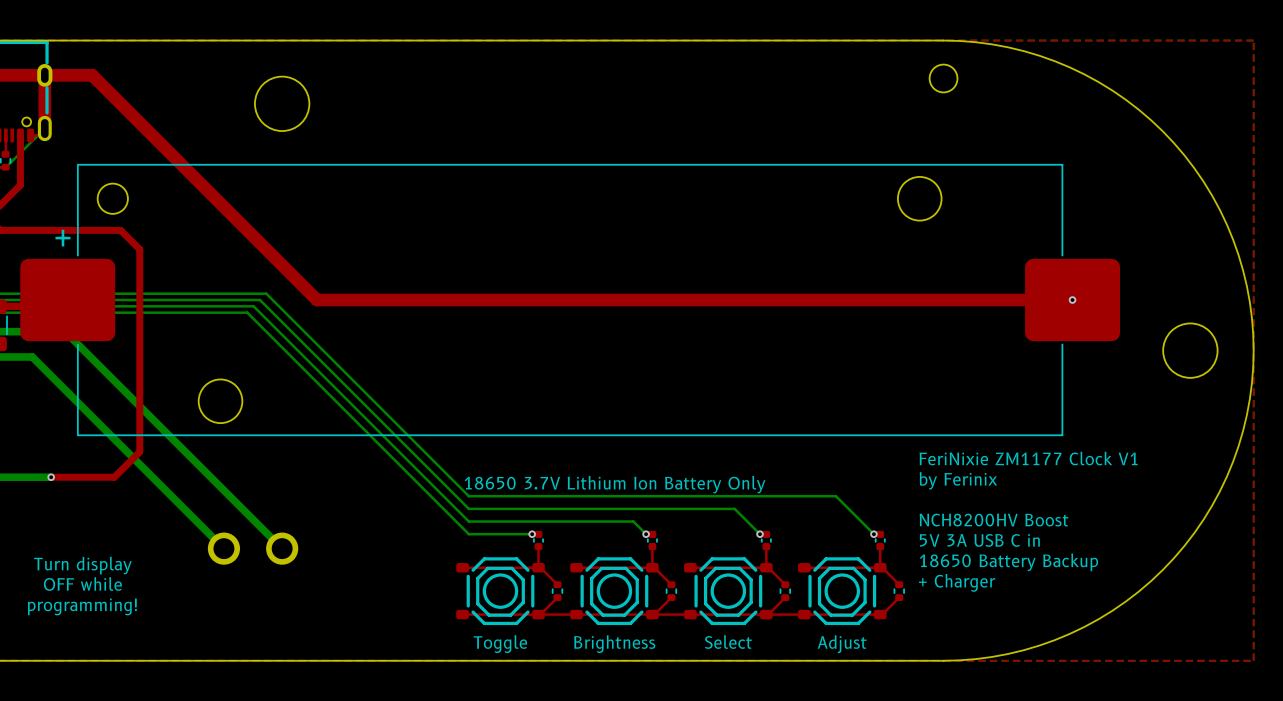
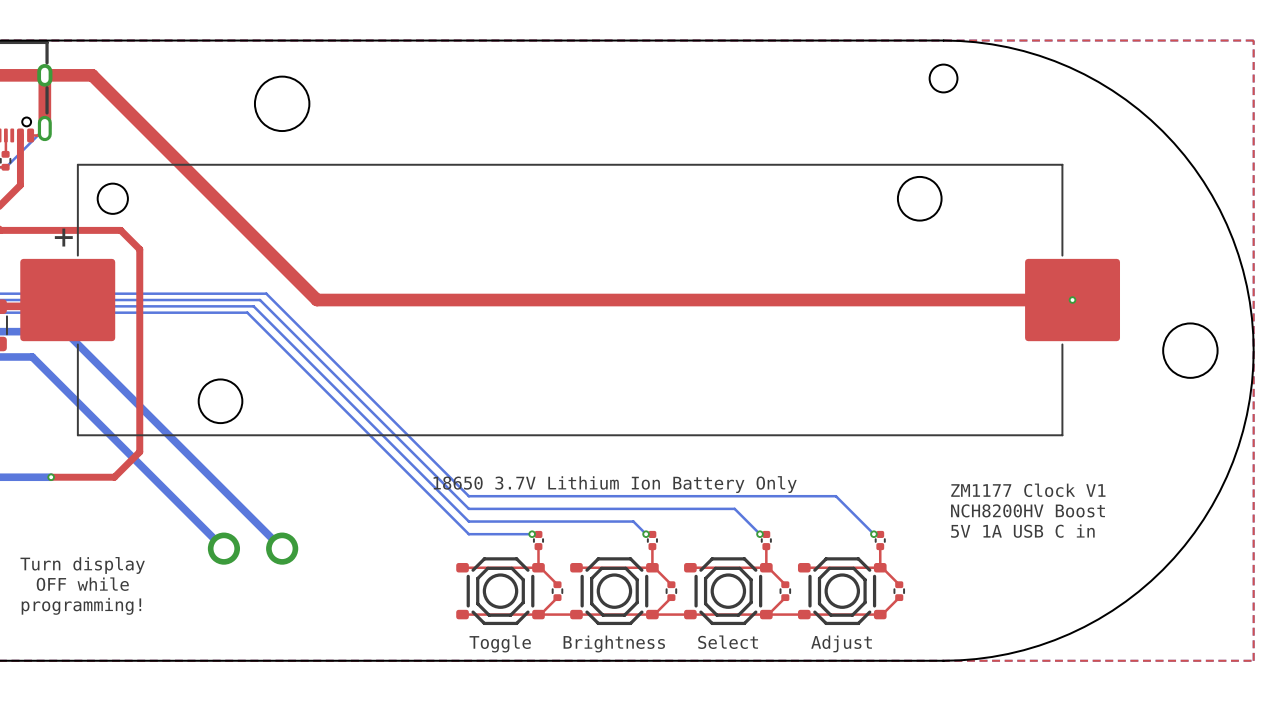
part footprint: [20, 164, 1121, 437] -> [20, 164, 1121, 437]
text: FeriNixie ZM1177 Clock V1 (1028, 458) -> none
text: by Ferinix (958, 480) -> none
text: none -> ZM1177 Clock V1 (1028, 490)
text position: NCH8200HV Boost (993, 520) -> NCH8200HV Boost (1028, 510)
text: 5V 3A USB C in (979, 540) -> 5V 1A USB C in (1022, 531)
text: 18650 Battery Backup (1008, 562) -> none
text: + Charger (957, 582) -> none

